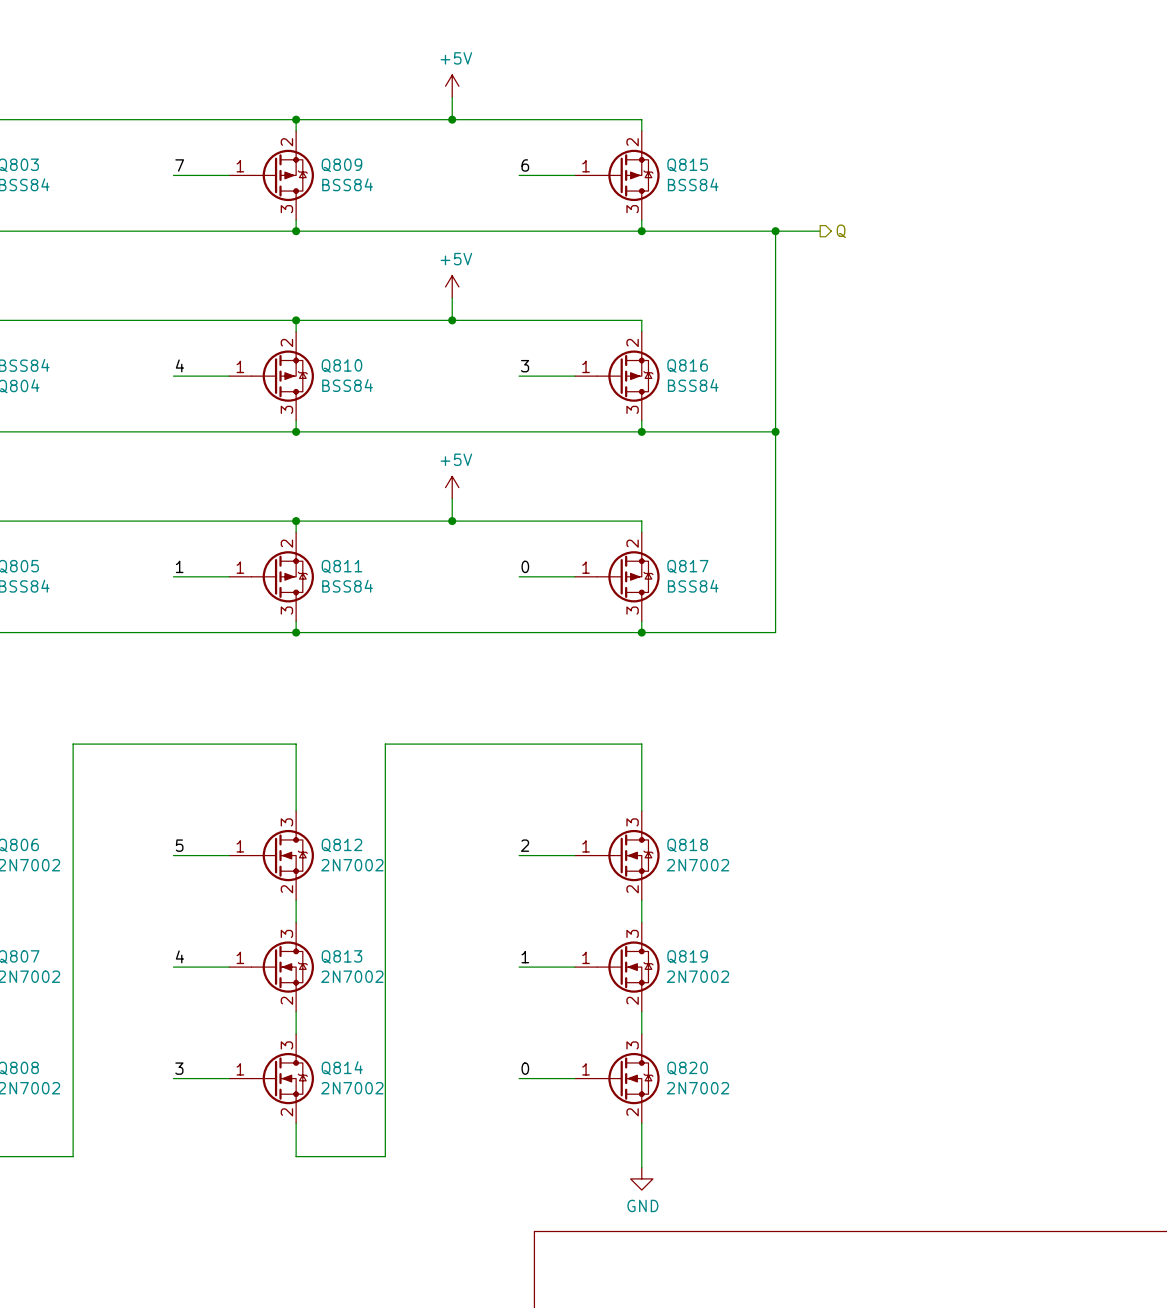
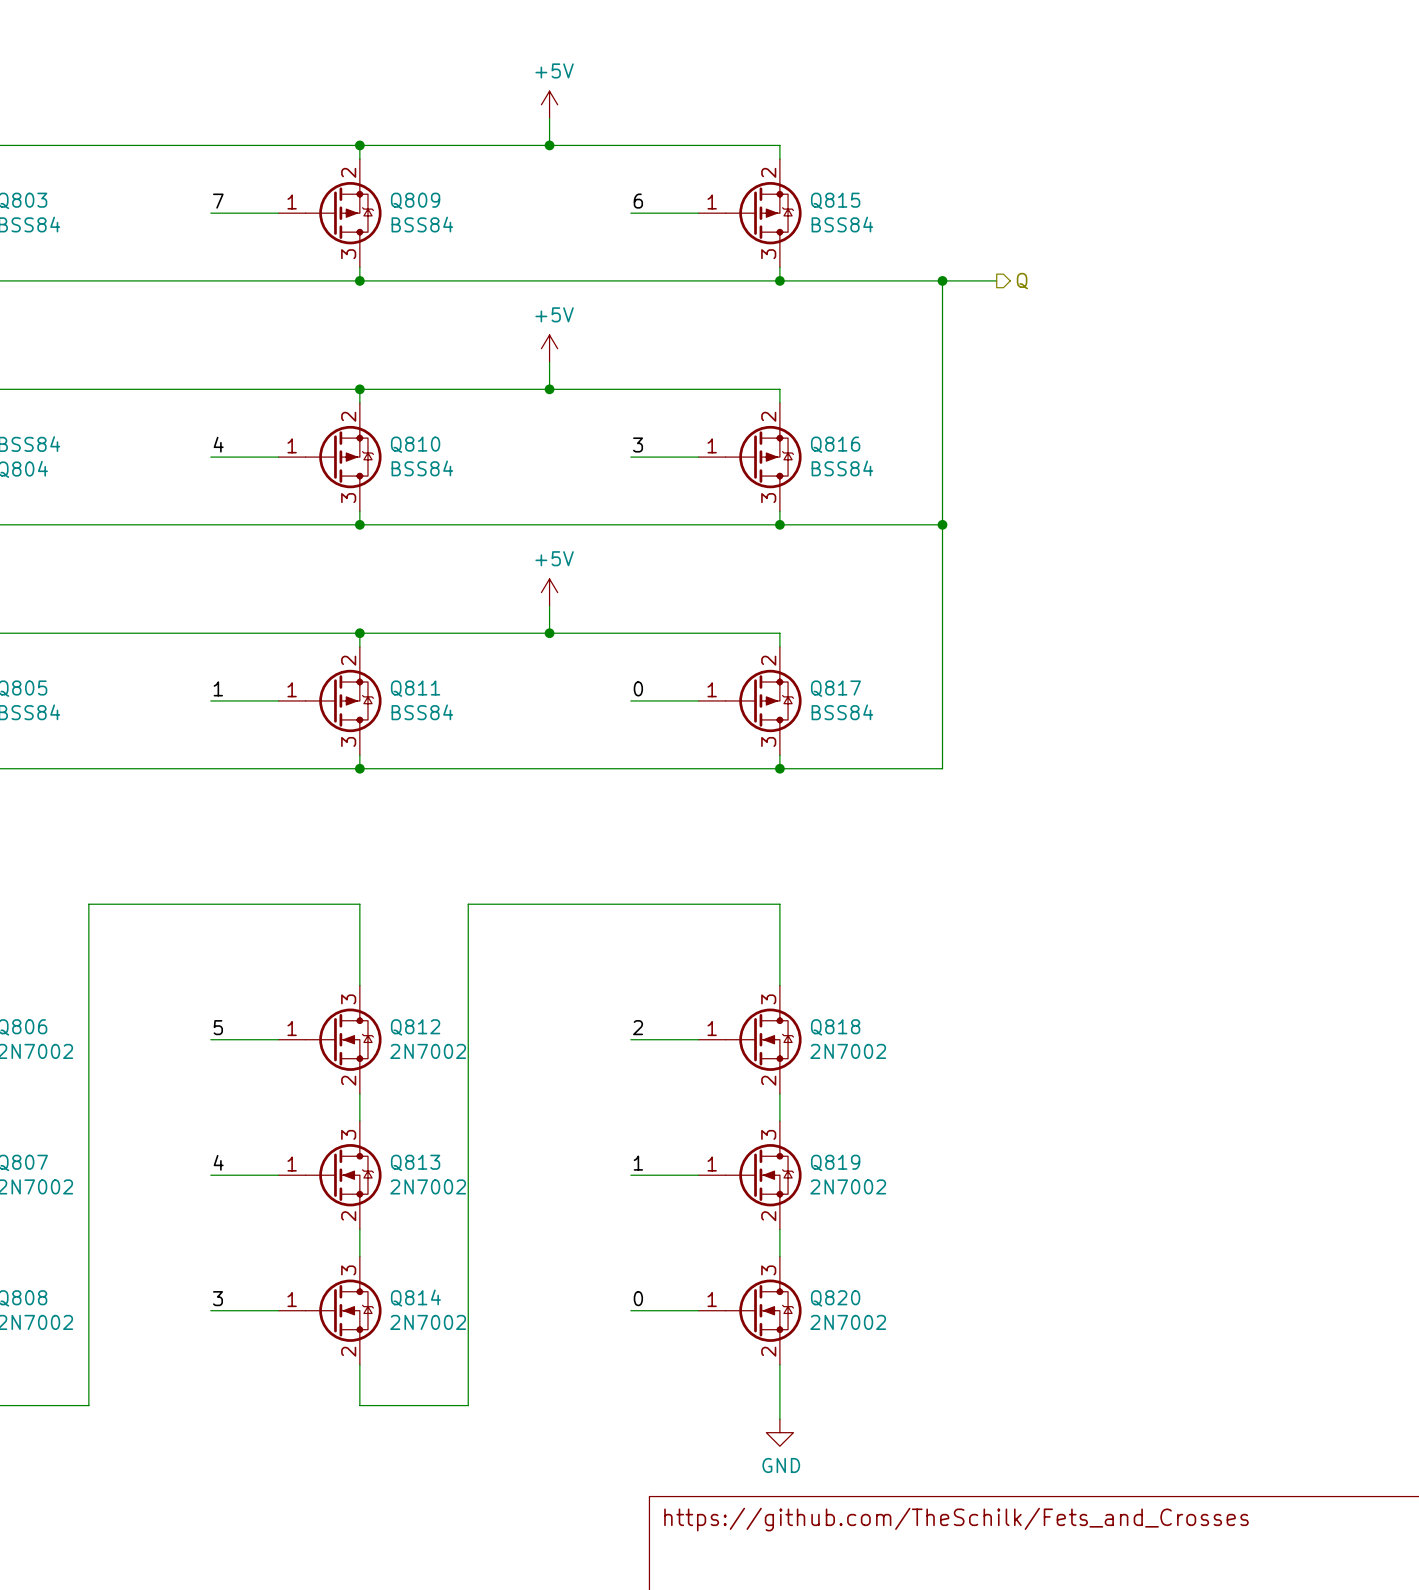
title block: none -> https://github.com/TheSchilk/Fets_and_Crosses (956, 1519)

